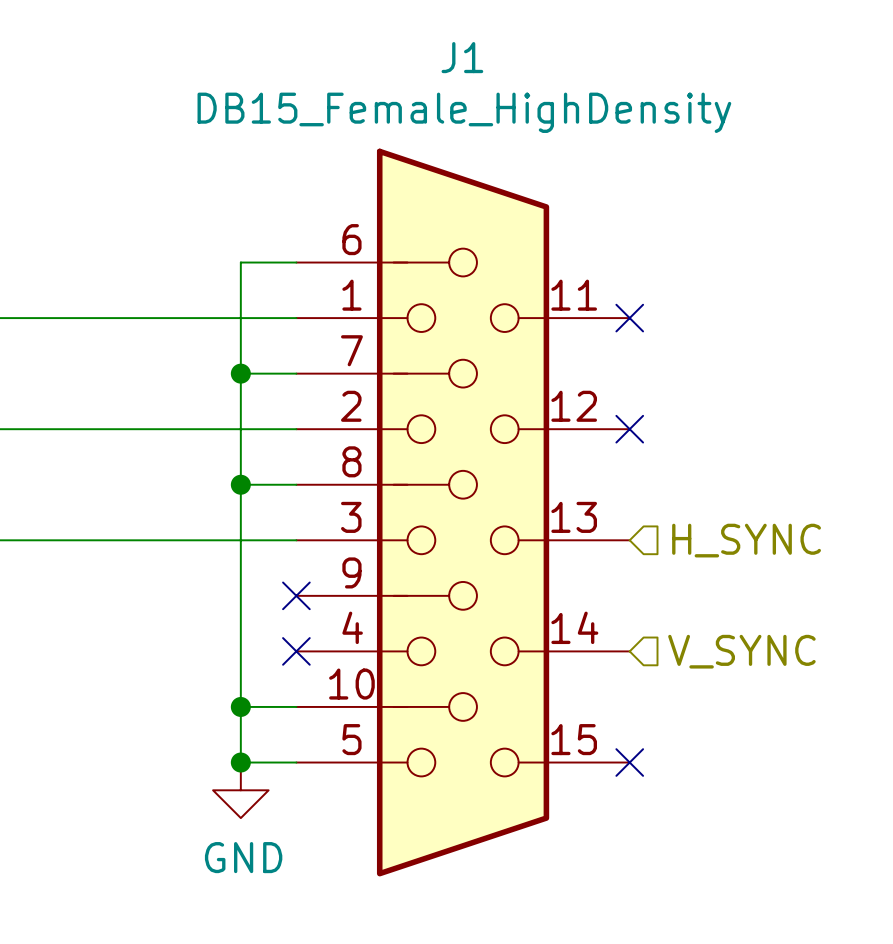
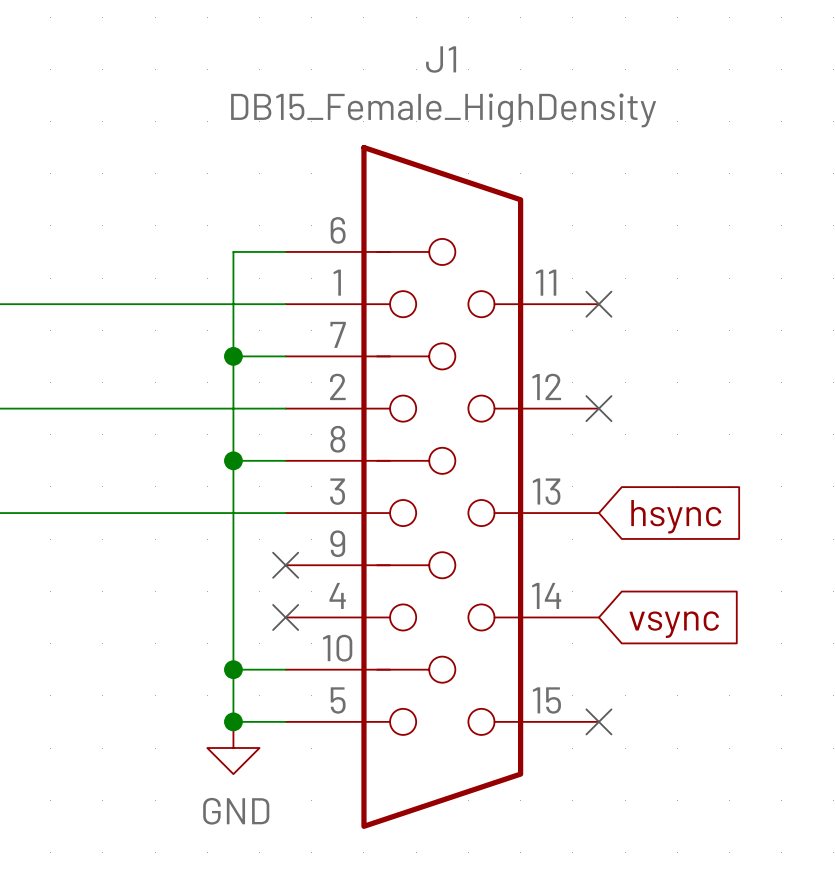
hierarchical label: H_SYNC (746, 540) -> none
global label: none -> hsync (676, 516)
hierarchical label: V_SYNC (741, 651) -> none
global label: none -> vsync (674, 624)

